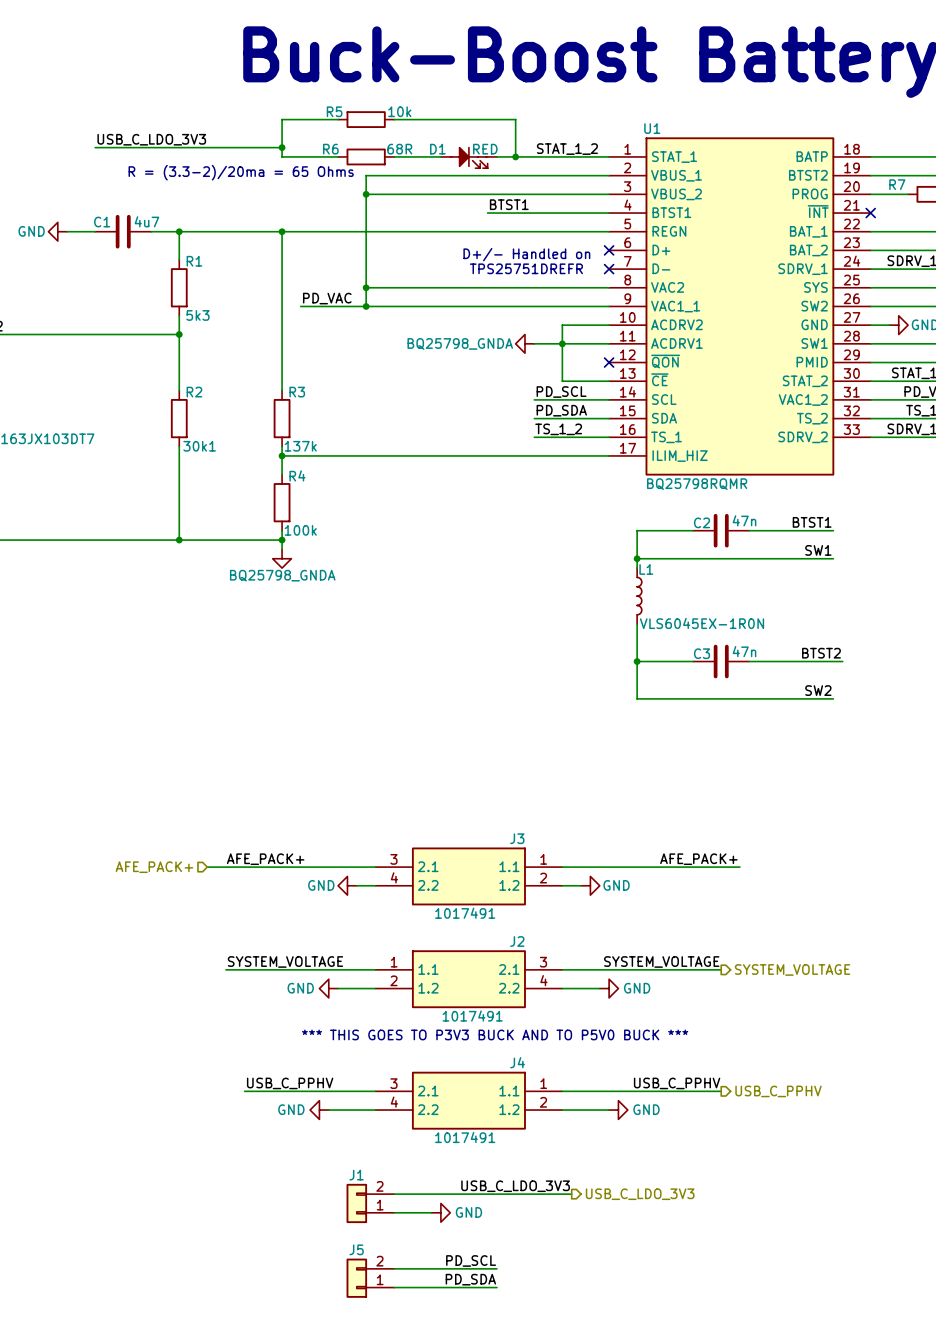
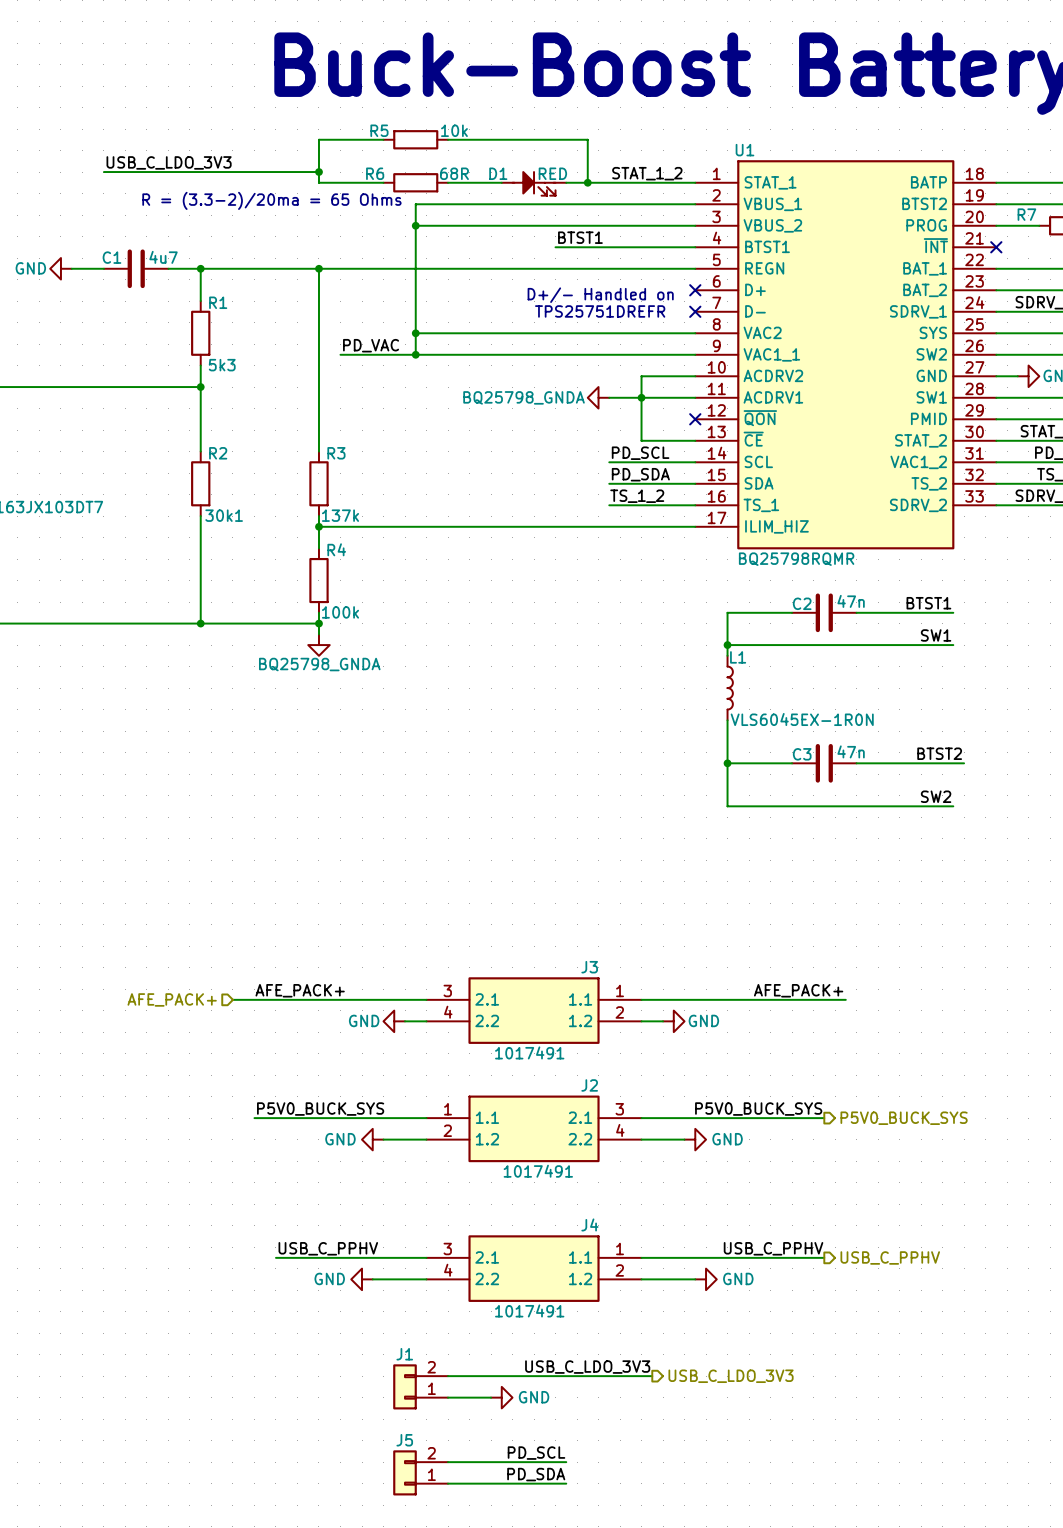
label: SYSTEM_VOLTAGE (285, 961) -> P5V0_BUCK_SYS (320, 1109)
label: SYSTEM_VOLTAGE (661, 961) -> P5V0_BUCK_SYS (758, 1109)
hierarchical label: SYSTEM_VOLTAGE (792, 969) -> P5V0_BUCK_SYS (904, 1118)
text: *** THIS GOES TO P3V3 BUCK AND TO P5V0 BUCK *** (495, 1034) -> none

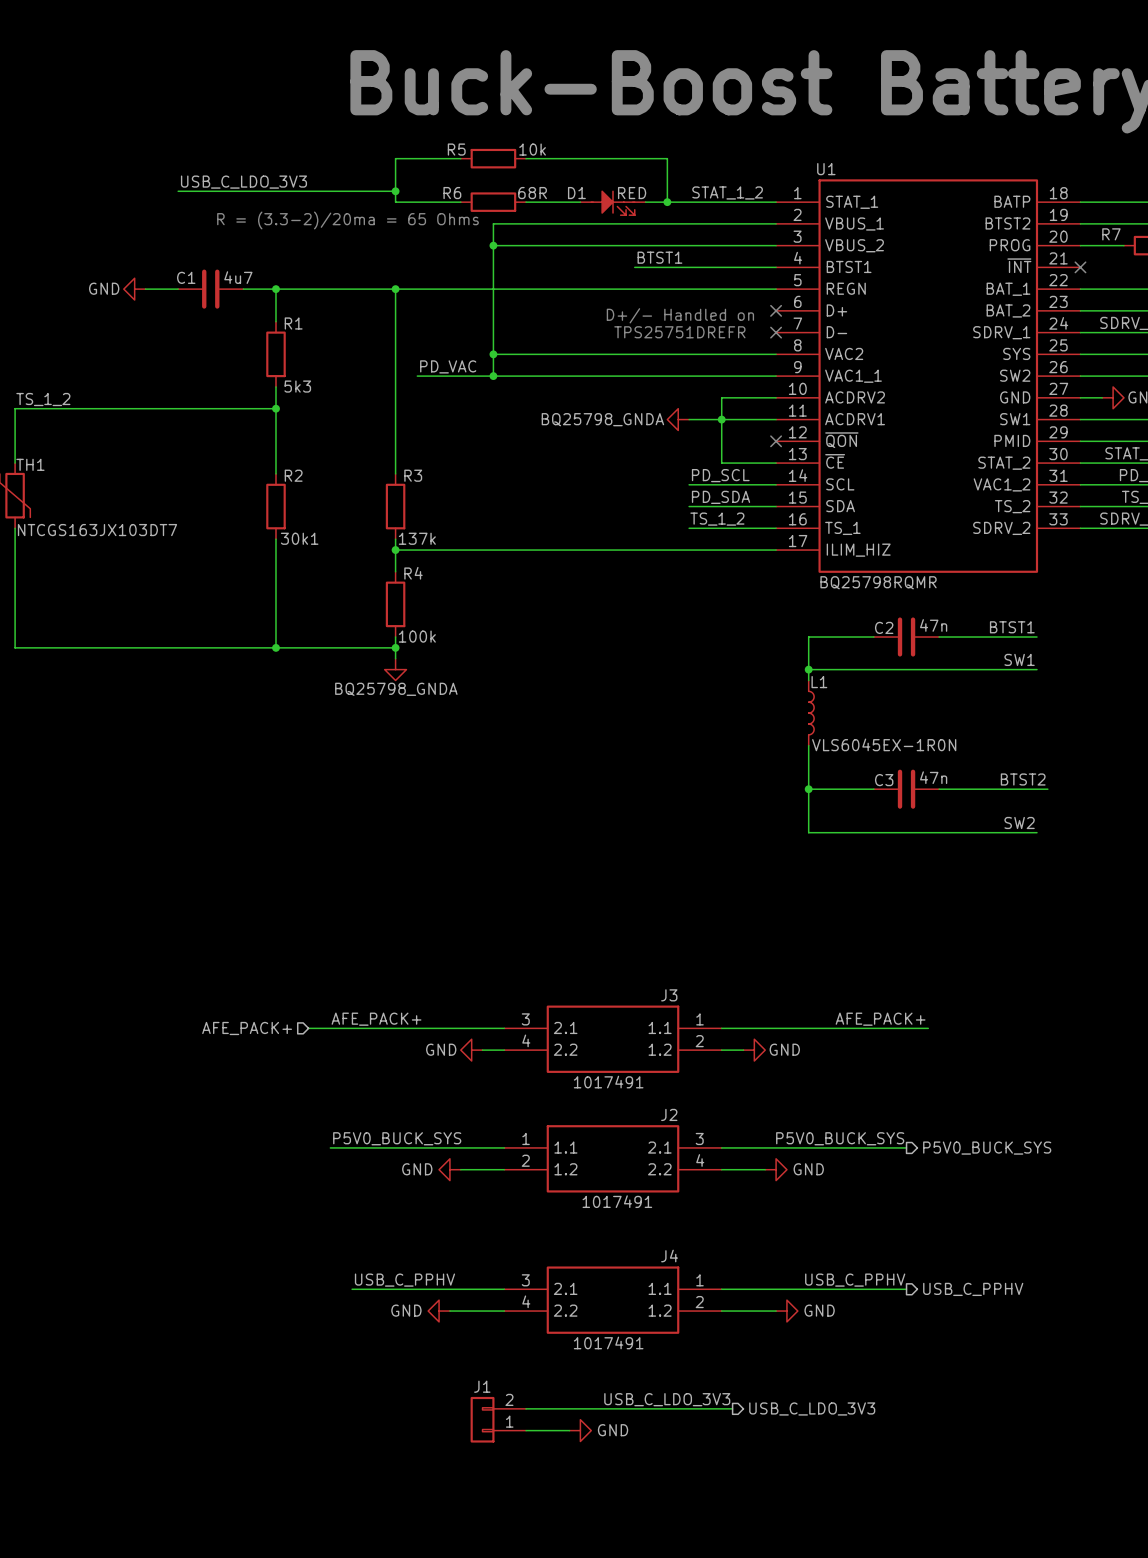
label: PD_SCL (536, 1453) -> none
wire: (448, 1462) (566, 1462) -> none
J5: (420, 1472) -> none
label: PD_SDA (536, 1474) -> none
wire: (448, 1483) (566, 1483) -> none

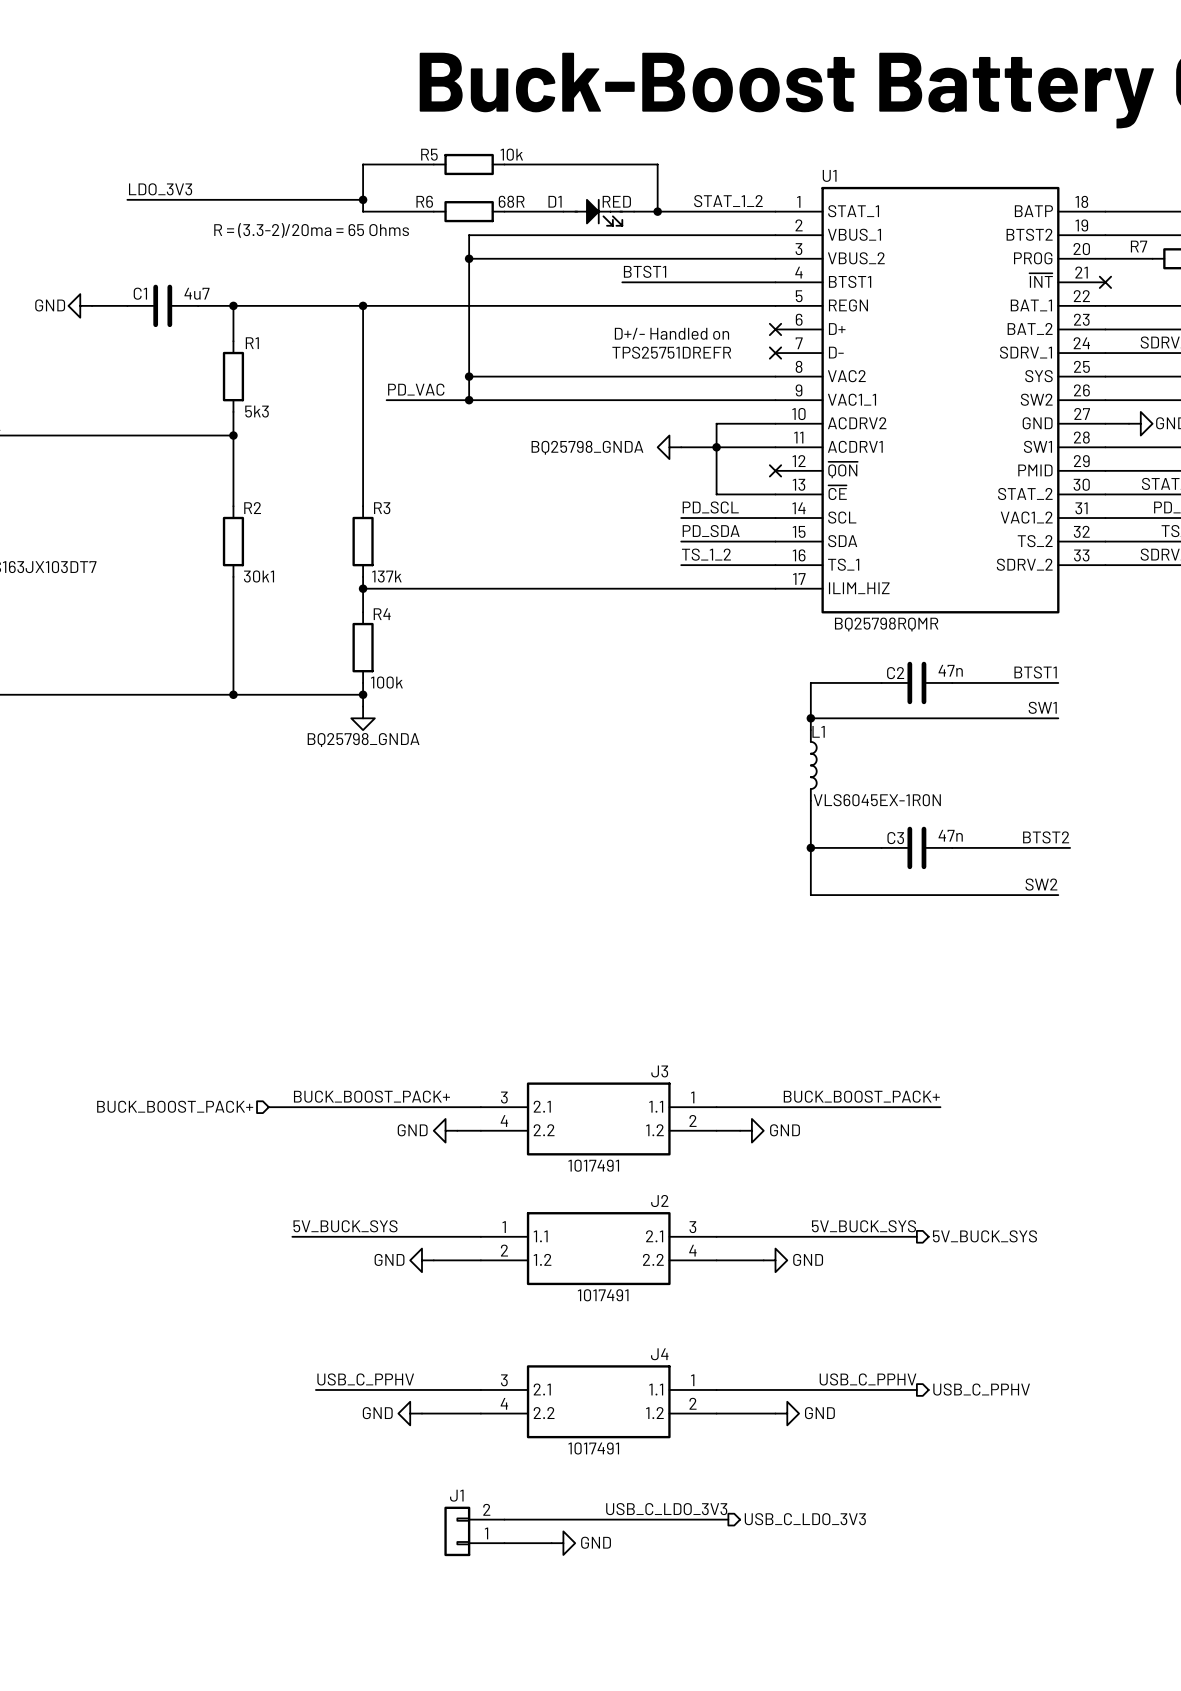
label: USB_C_LDO_3V3 (243, 182) -> LDO_3V3 (160, 189)
label: AFE_PACK+ (376, 1019) -> BUCK_BOOST_PACK+ (371, 1096)
label: AFE_PACK+ (880, 1019) -> BUCK_BOOST_PACK+ (861, 1096)
hierarchical label: AFE_PACK+ (247, 1028) -> BUCK_BOOST_PACK+ (175, 1106)
label: P5V0_BUCK_SYS (397, 1138) -> 5V_BUCK_SYS (345, 1226)
label: P5V0_BUCK_SYS (840, 1138) -> 5V_BUCK_SYS (863, 1226)
hierarchical label: P5V0_BUCK_SYS (987, 1148) -> 5V_BUCK_SYS (984, 1236)

